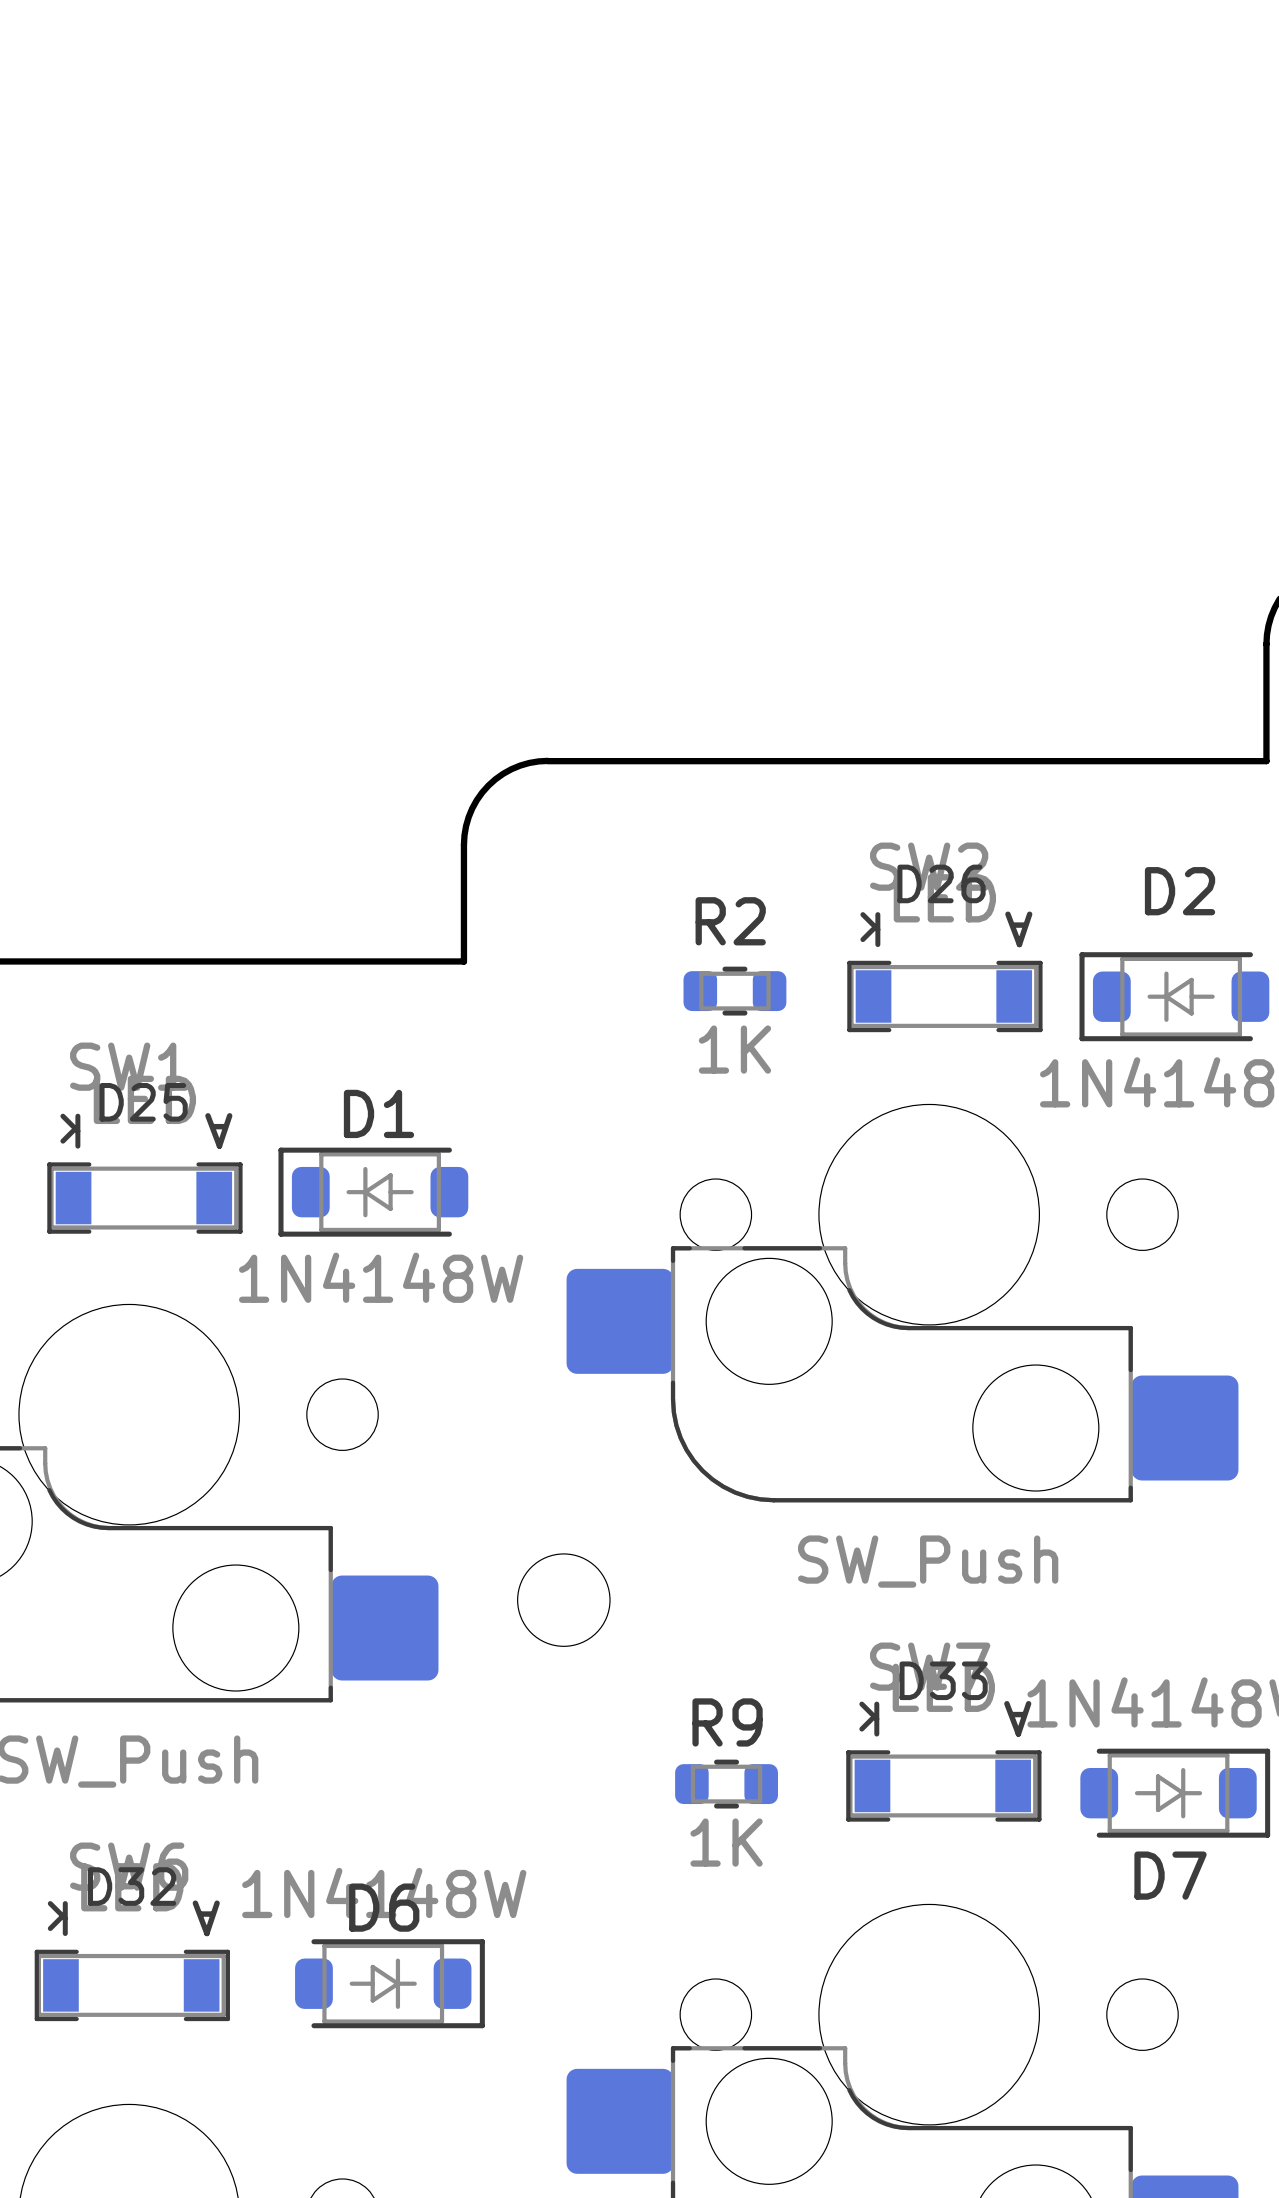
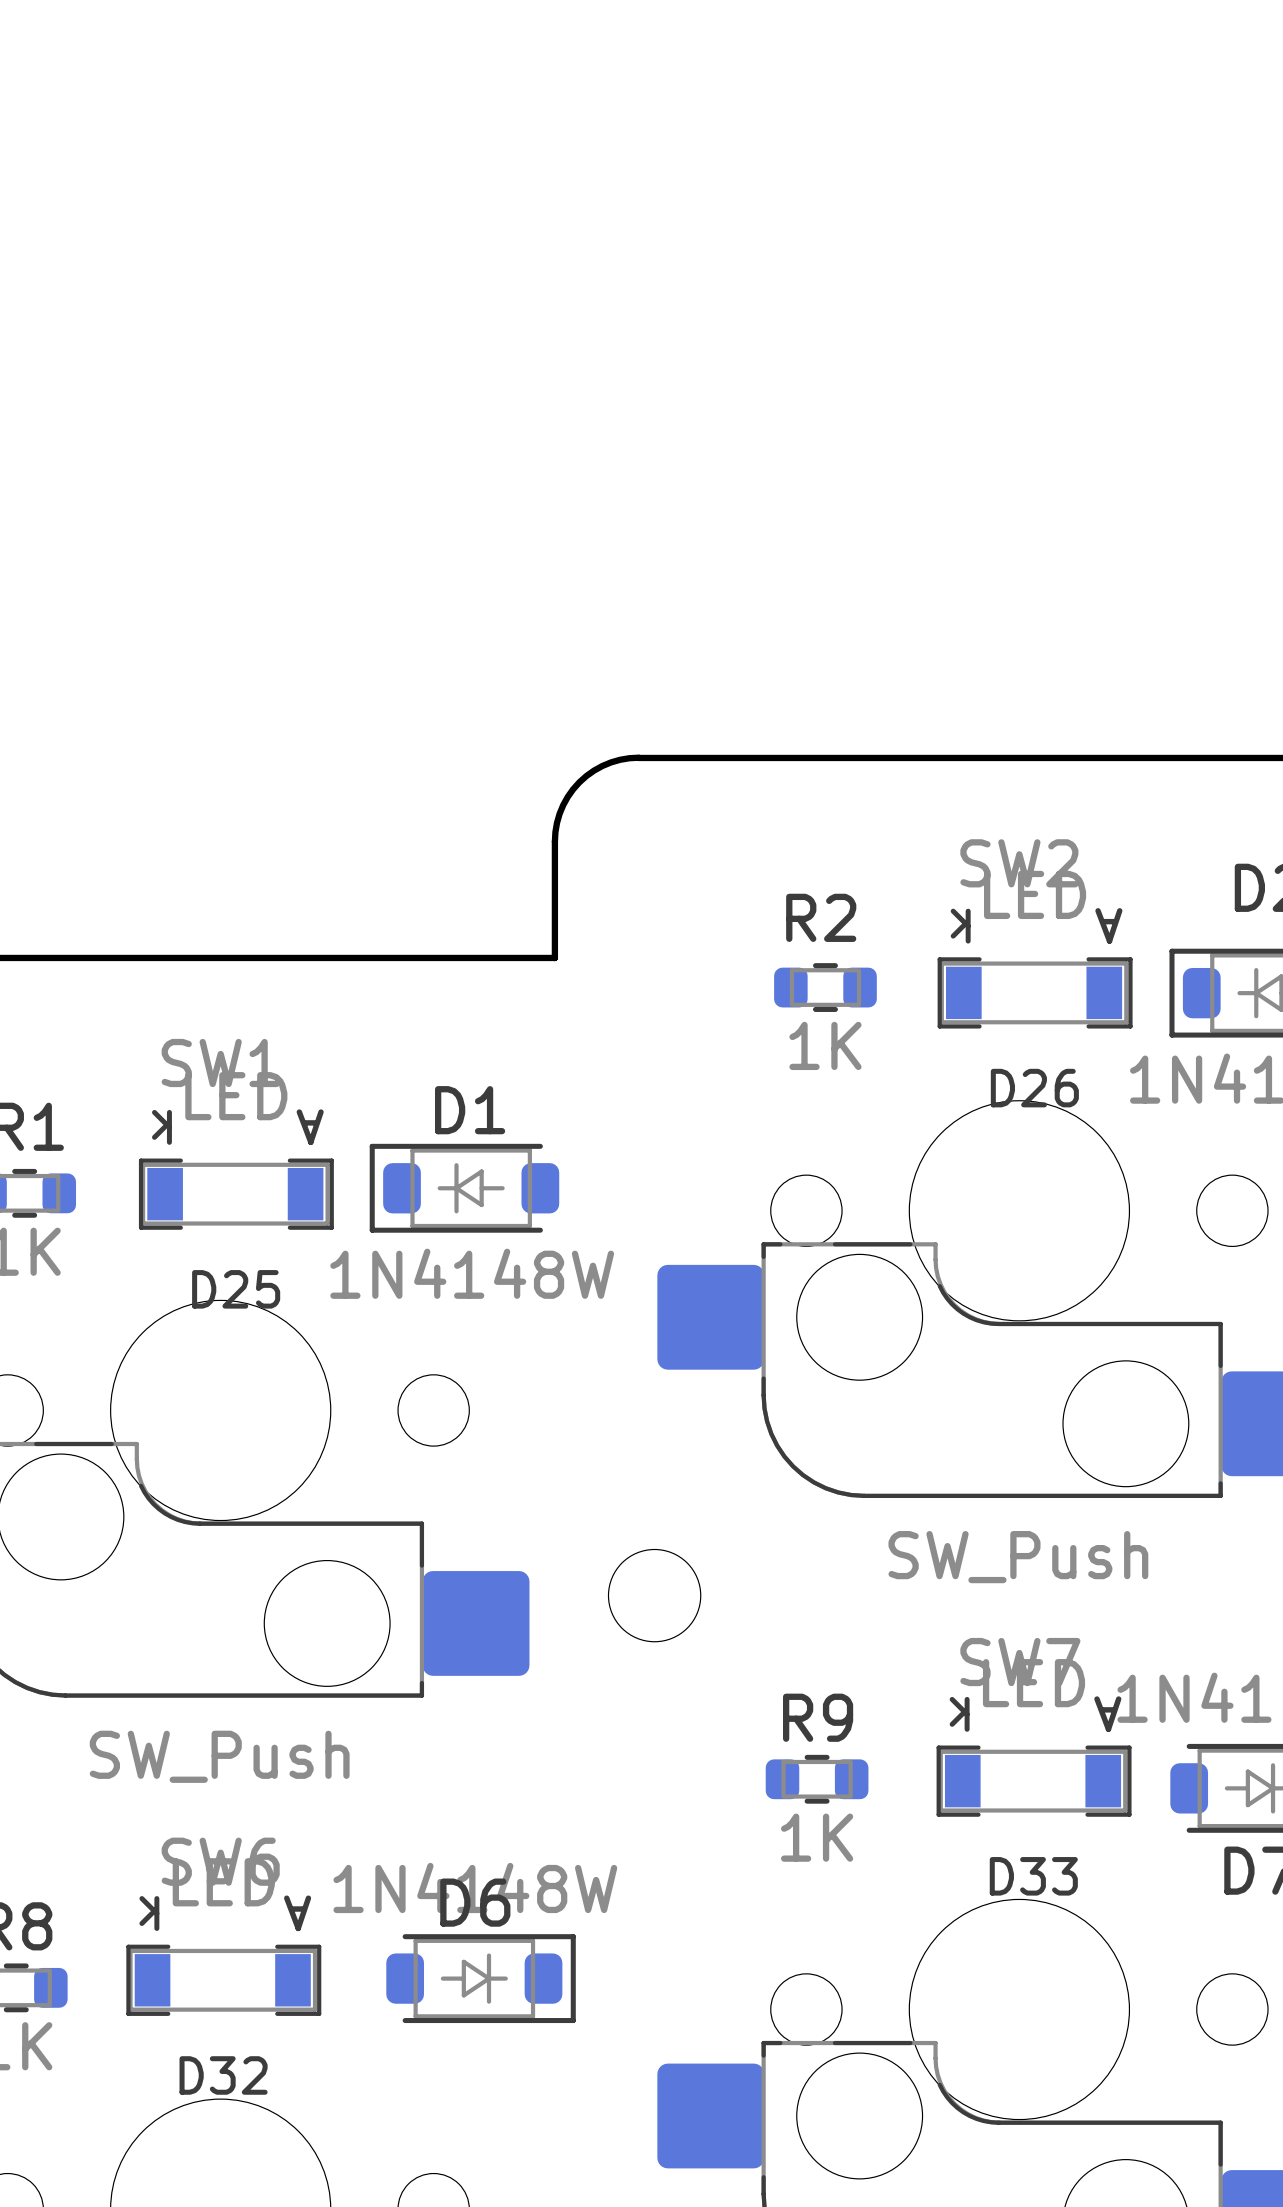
D26 name position: D26 (941, 883) -> D26 (1034, 1088)
D25 name position: D25 (143, 1102) -> D25 (236, 1289)
D33 name position: D33 (943, 1680) -> D33 (1033, 1876)
D32 name position: D32 (132, 1886) -> D32 (223, 2075)

